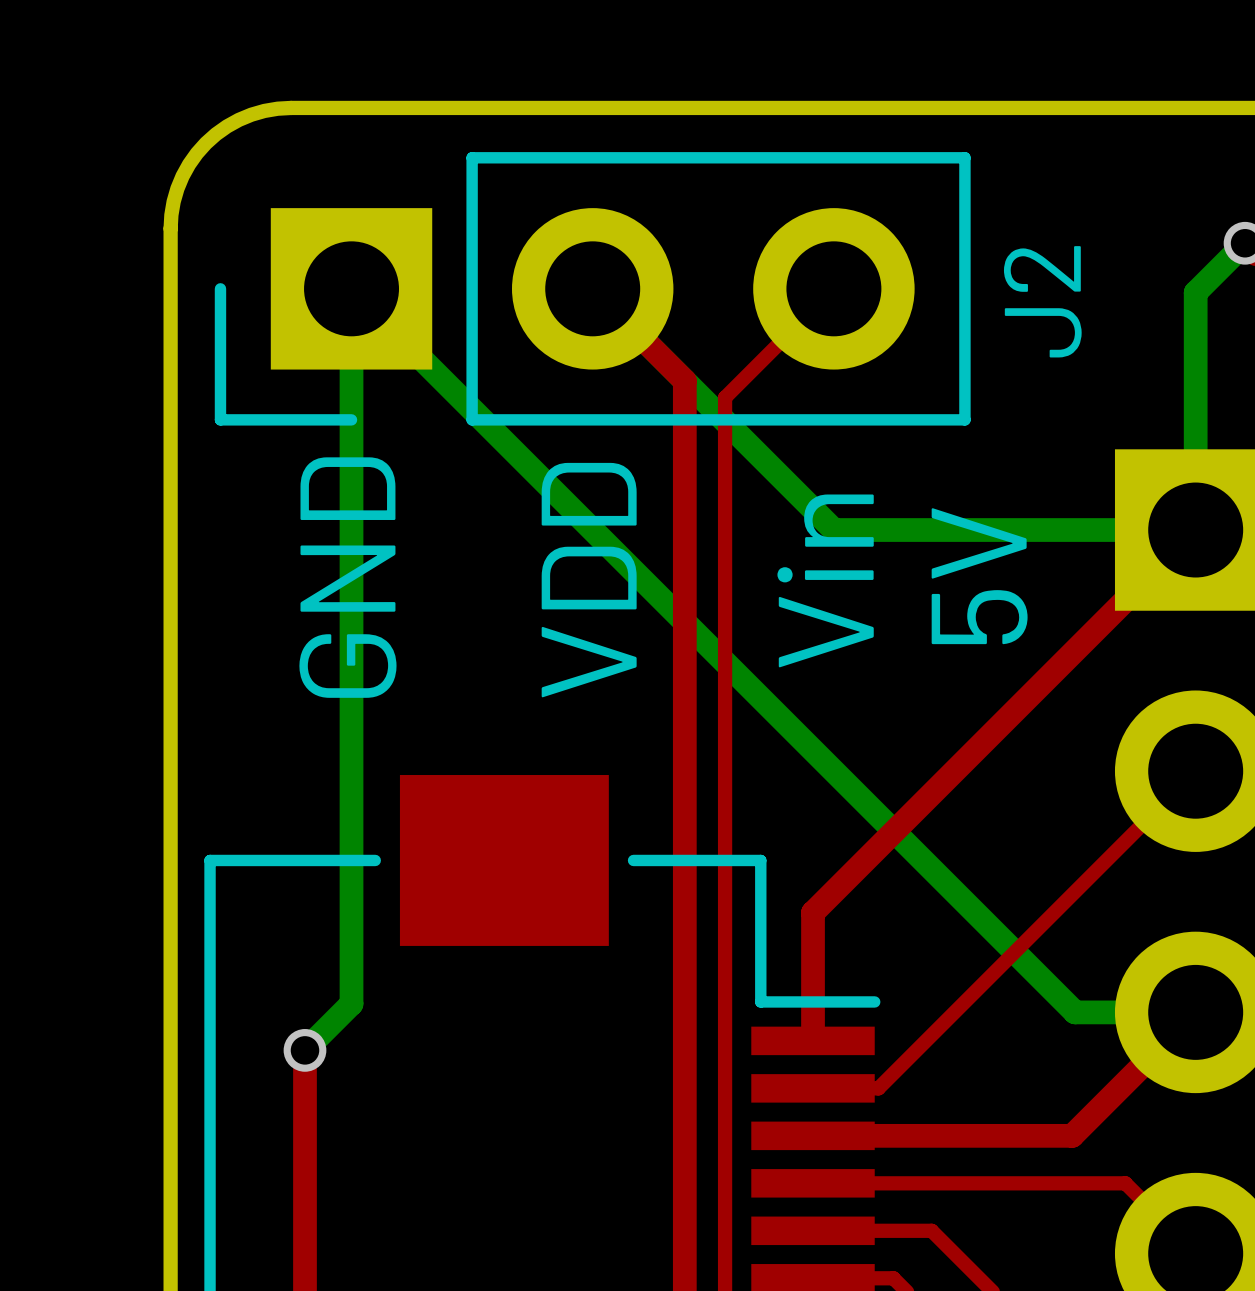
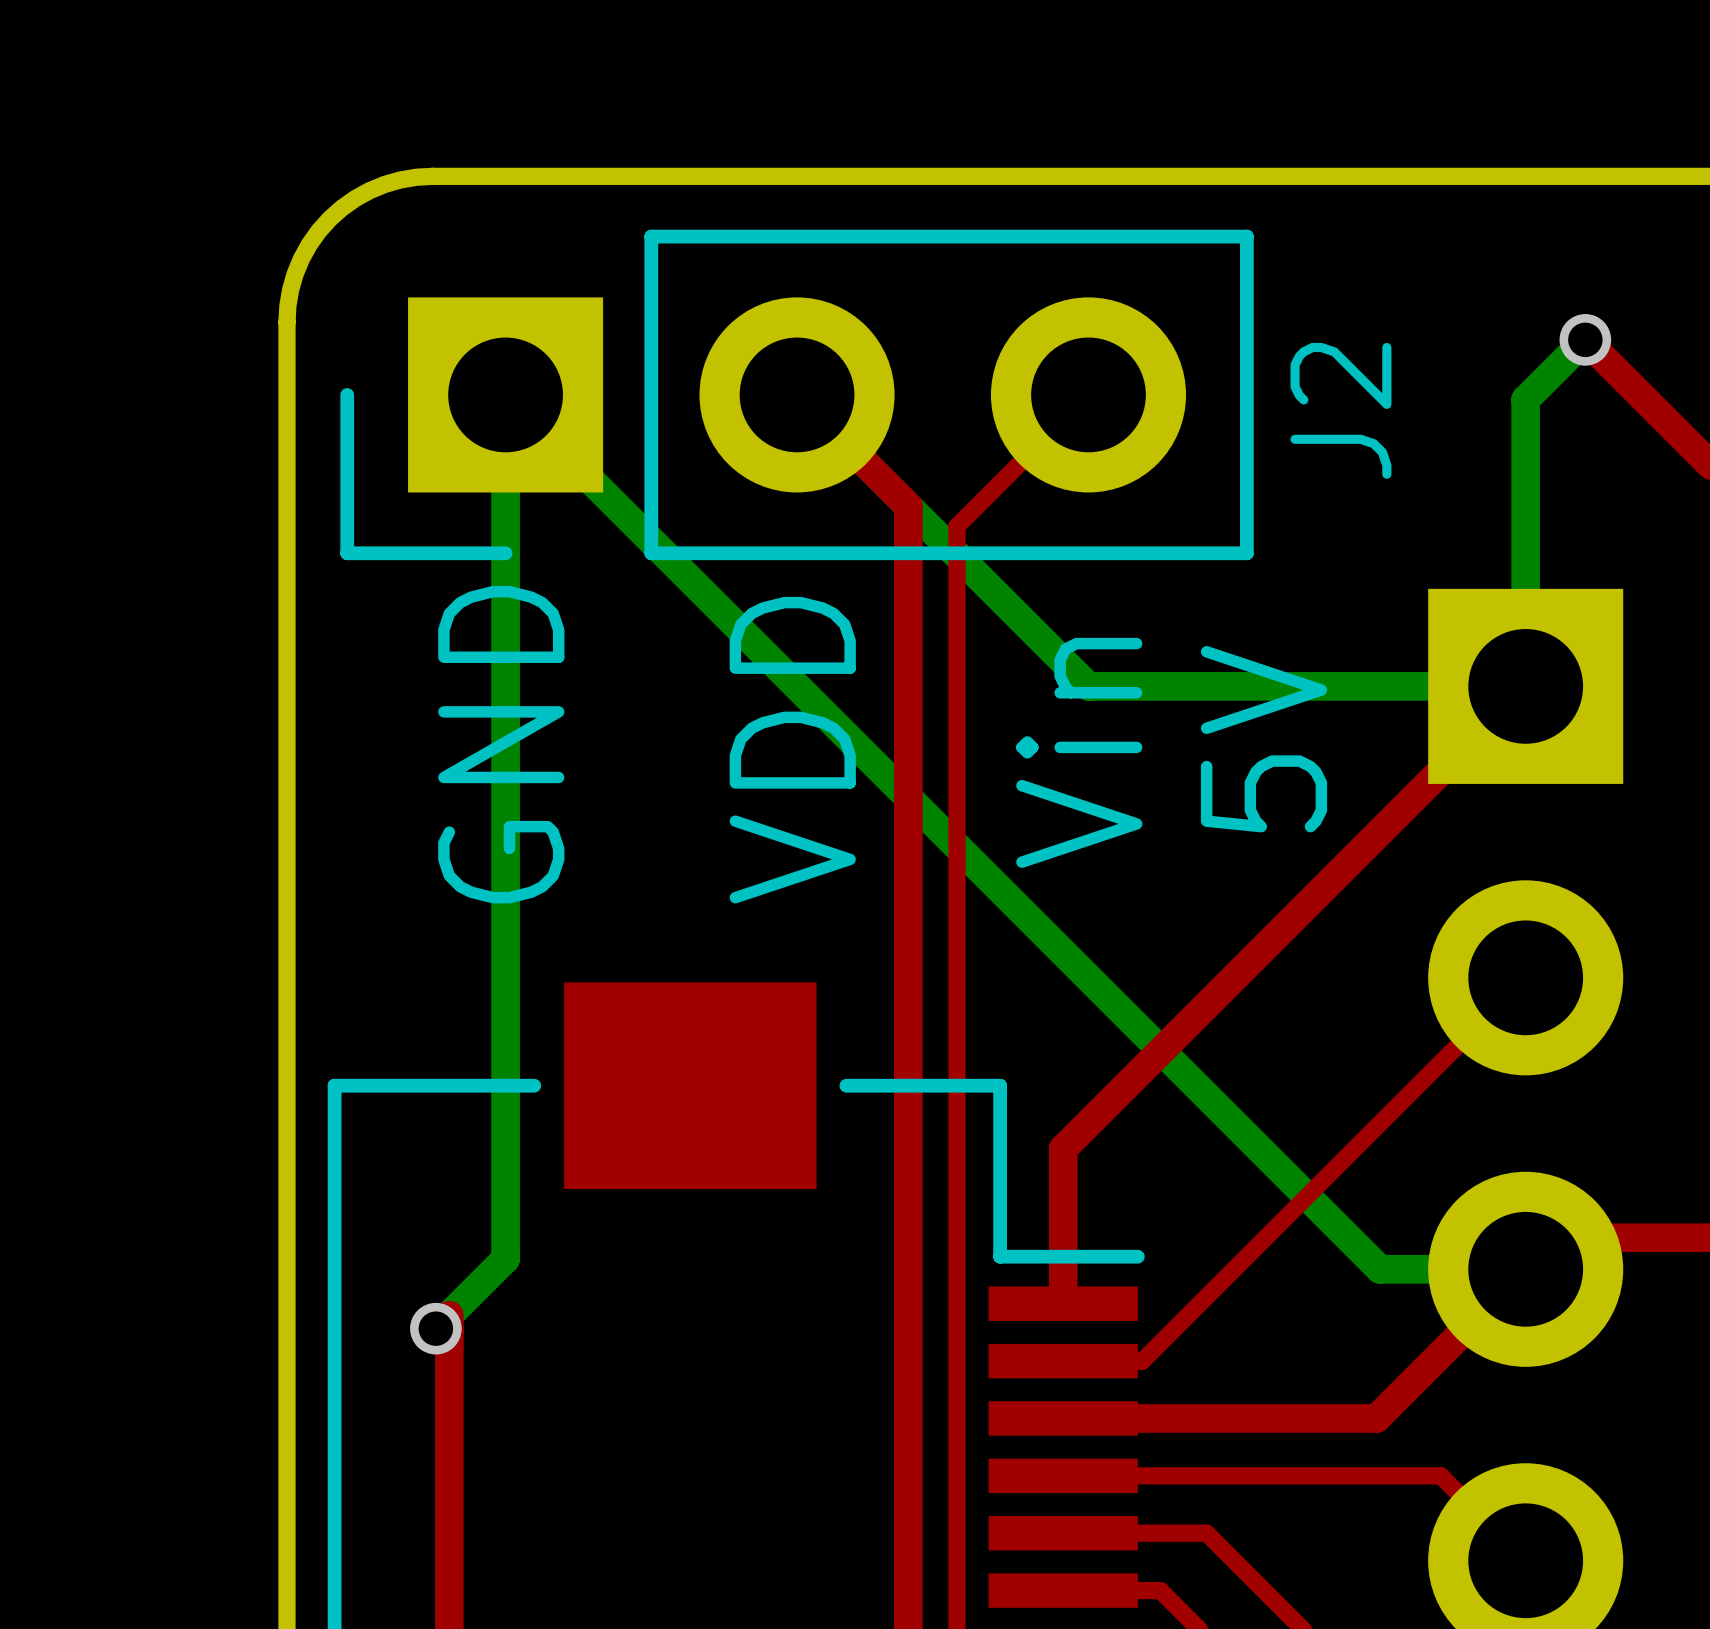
via position: (304, 1050) -> (435, 1328)

